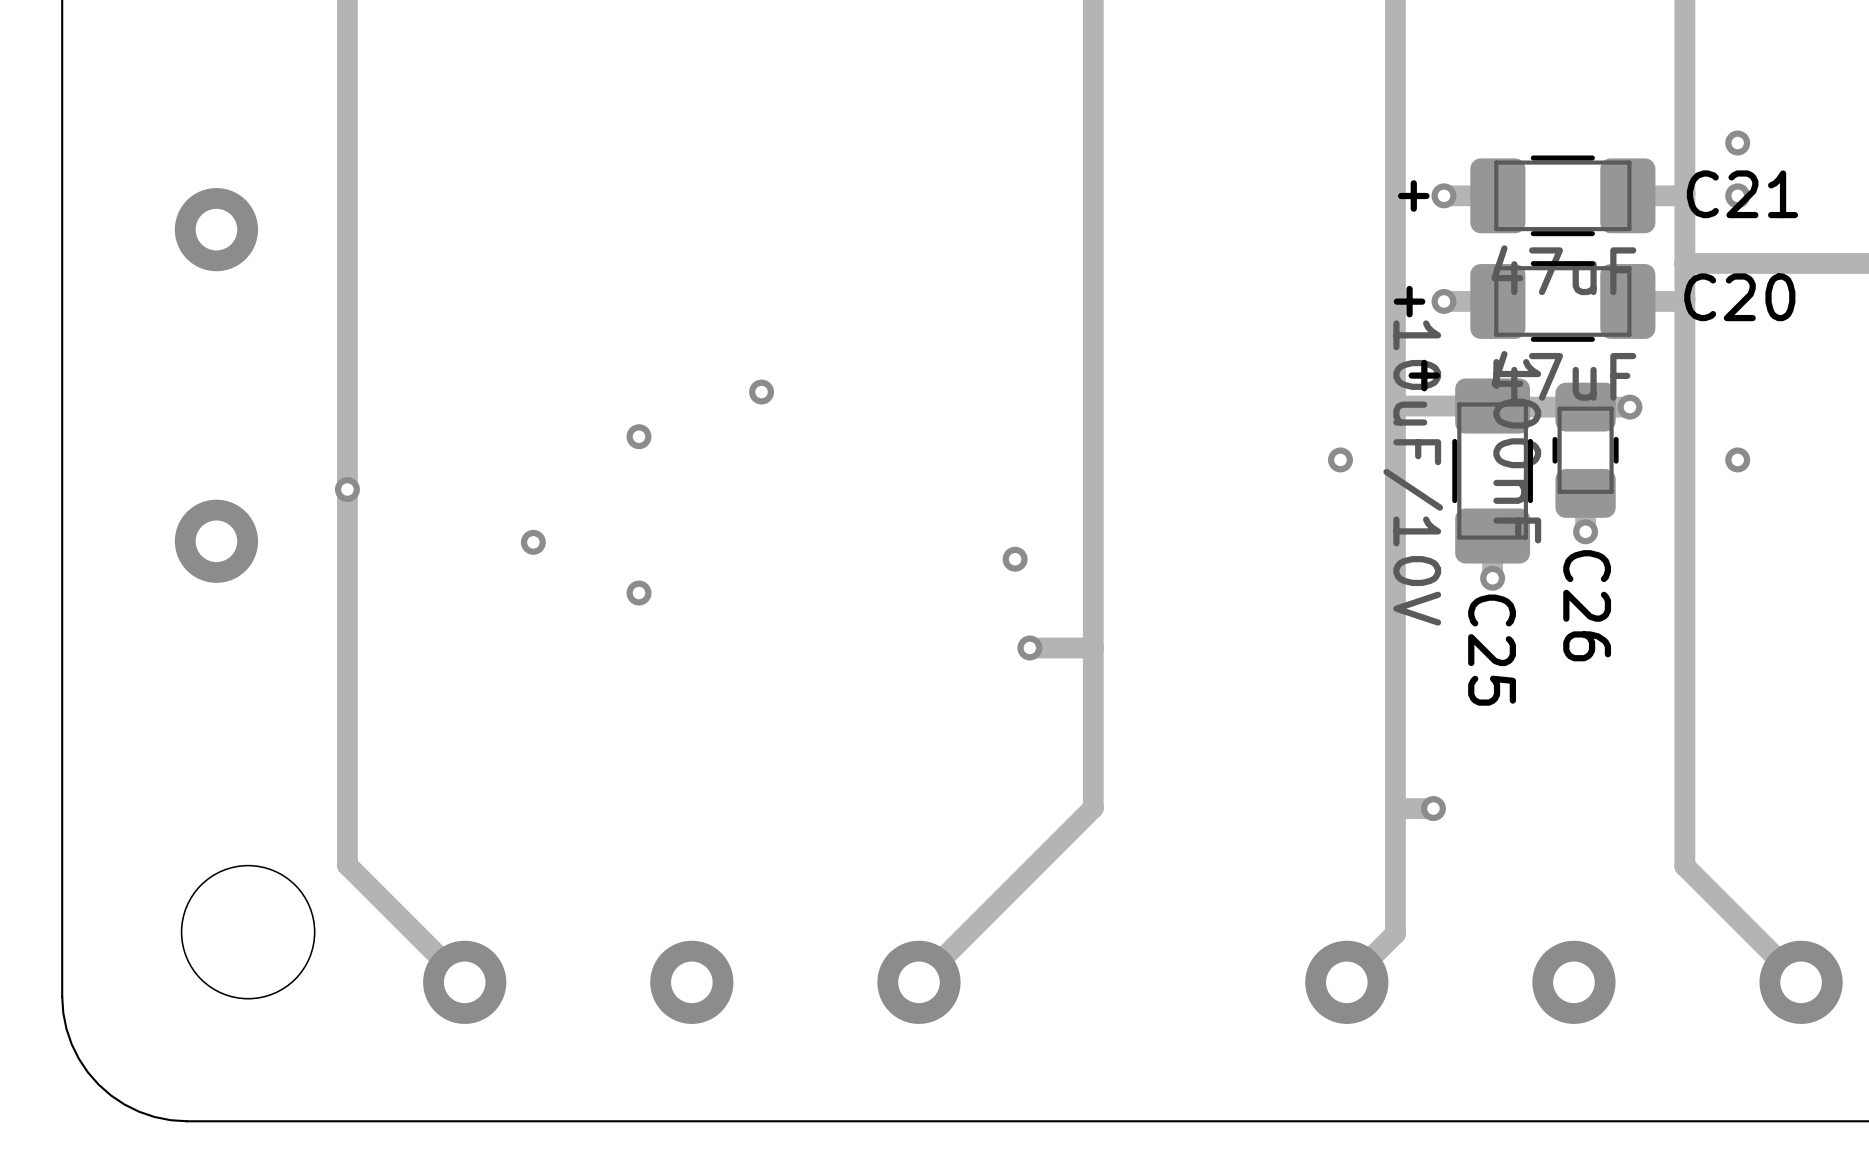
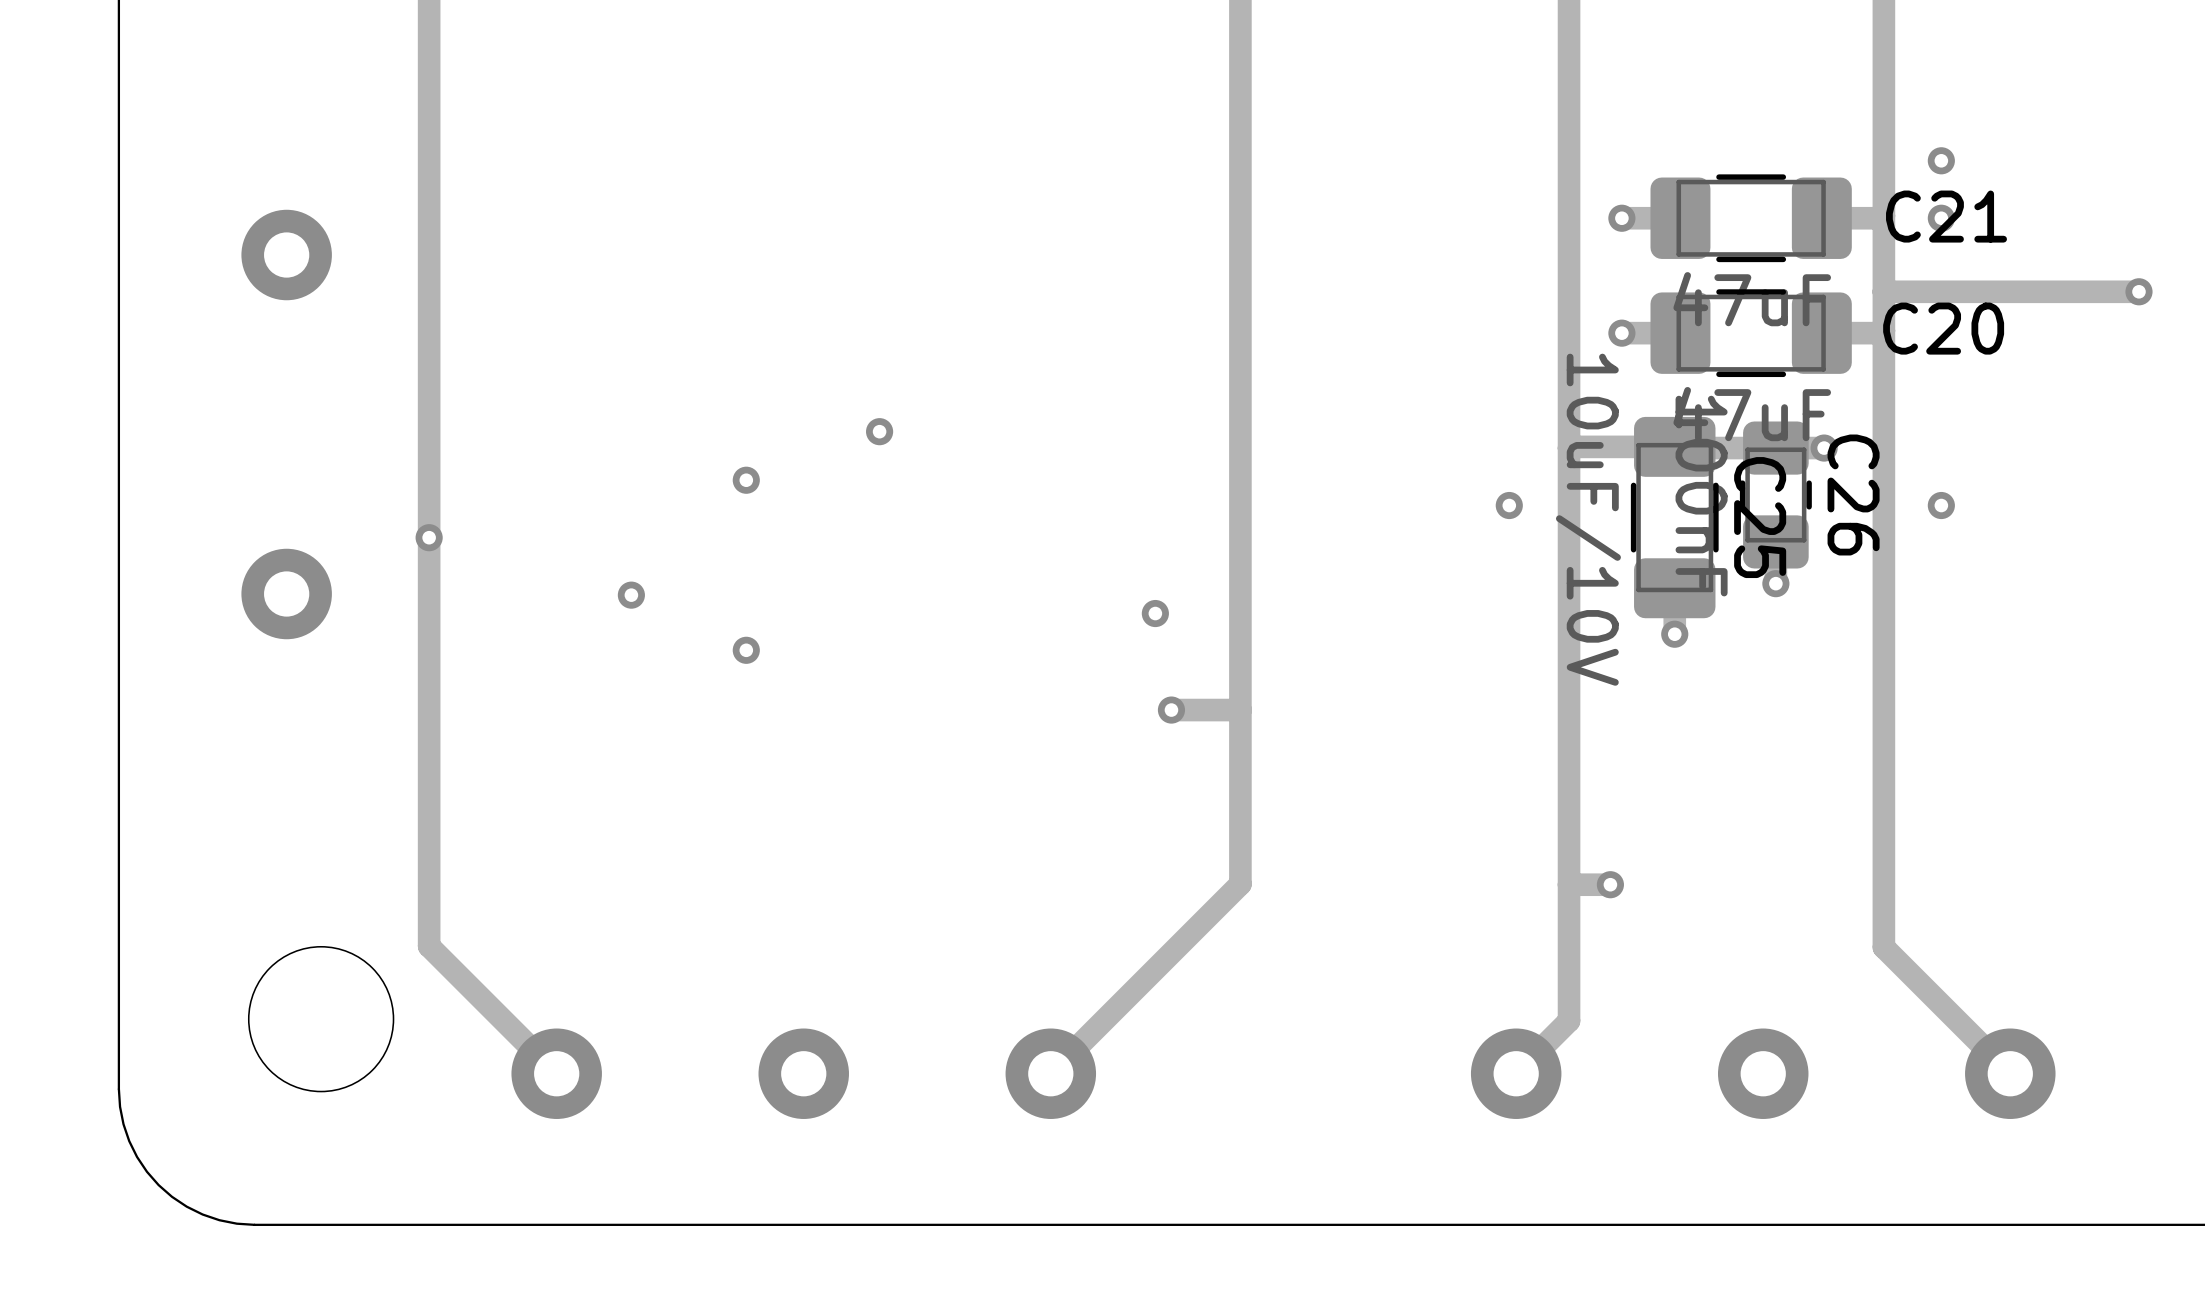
text: + (1413, 195) -> none
text: + (1409, 301) -> none
text: + (1424, 375) -> none
C26 name position: C26 (1587, 605) -> C26 (1853, 495)
C25 name position: C25 (1492, 650) -> C25 (1760, 517)

